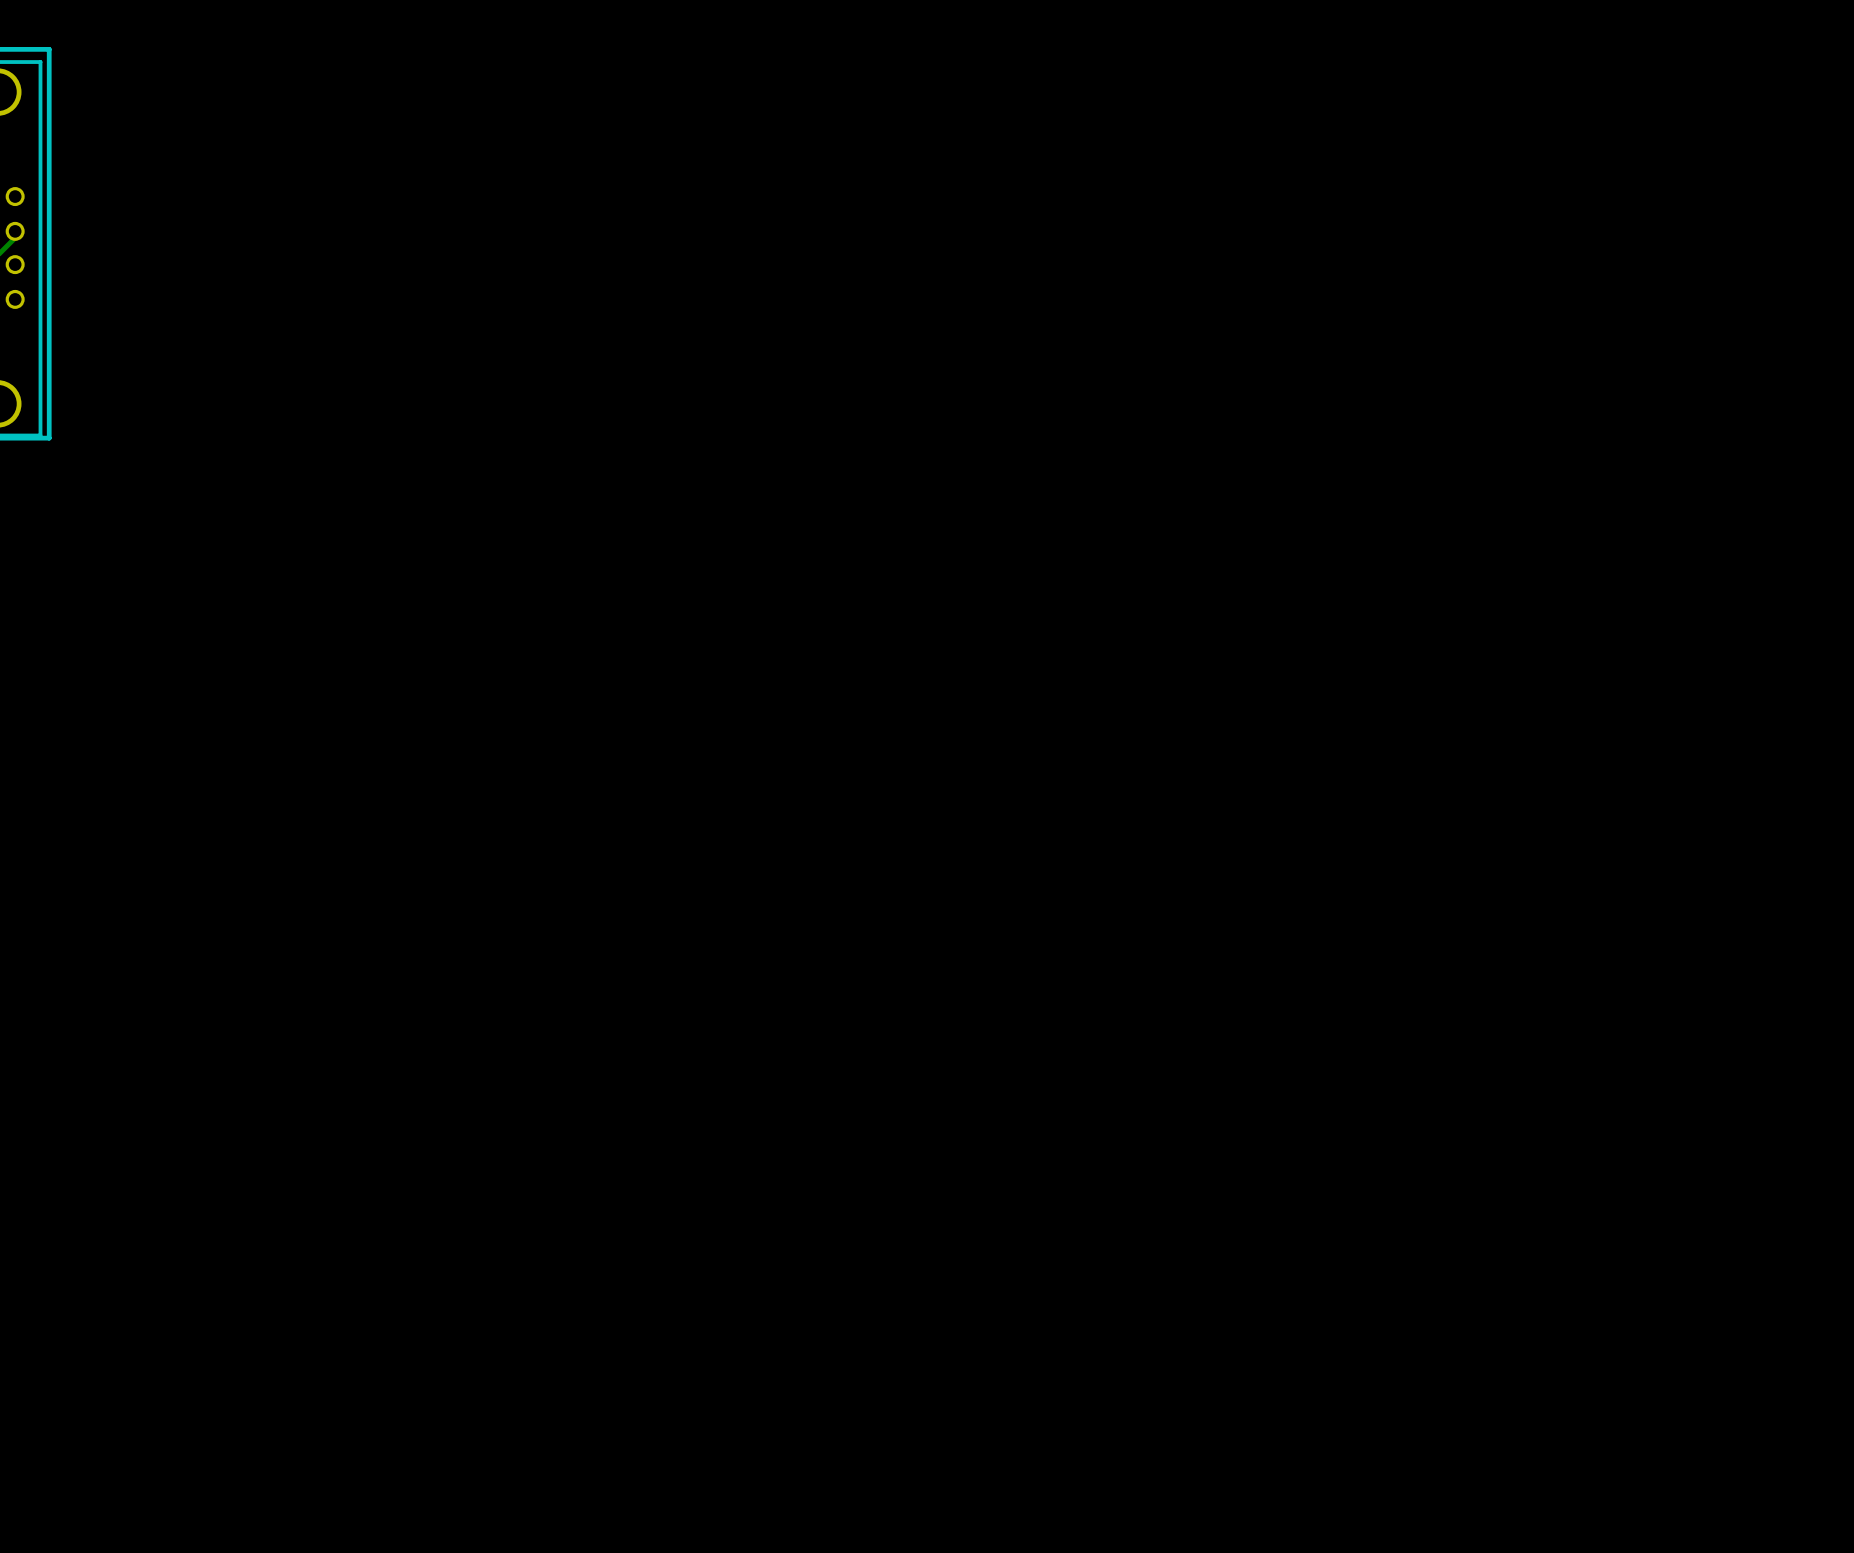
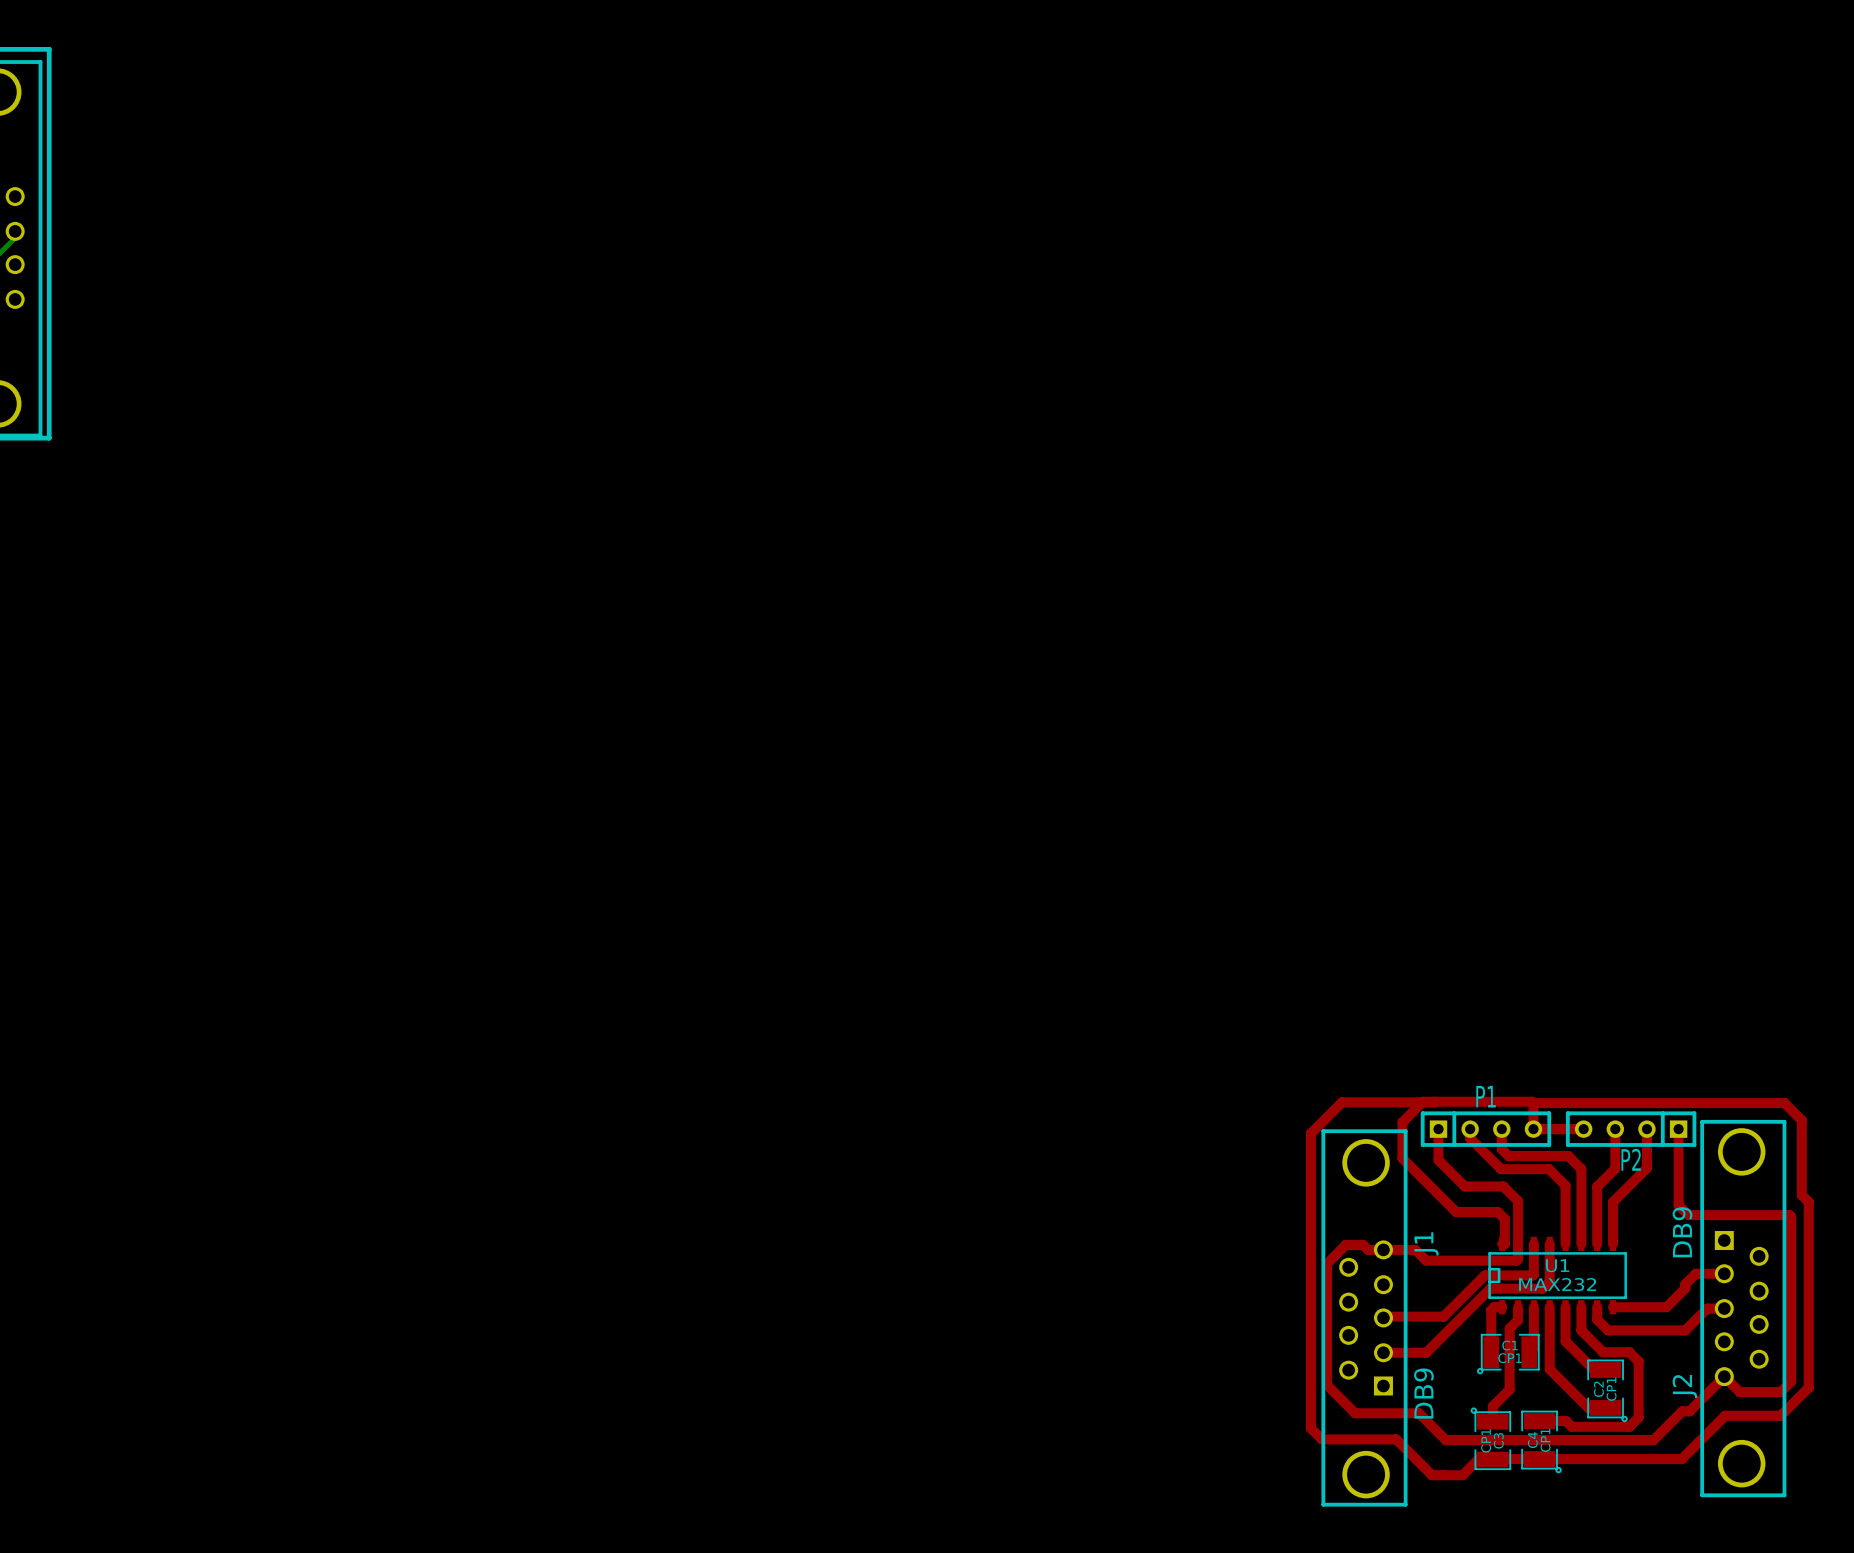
top track: none -> (1434, 1101) (1342, 1102) (1310, 1133) (1310, 1428) (1322, 1439) (1396, 1439) (1432, 1475) (1462, 1475) (1478, 1459) (1681, 1459) (1725, 1415) (1780, 1415) (1808, 1387) (1808, 1202) (1801, 1195) (1801, 1120) (1784, 1103) (1533, 1103)
top track: none -> (1533, 1103) (1533, 1129) (1583, 1129)
top track: none -> (1533, 1103) (1423, 1101) (1402, 1122) (1402, 1158) (1456, 1211) (1497, 1211) (1504, 1219) (1504, 1243) (1502, 1243)
top track: none -> (1438, 1129) (1438, 1160) (1464, 1186) (1503, 1186) (1518, 1201) (1518, 1259) (1516, 1260) (1426, 1260) (1415, 1249) (1368, 1249) (1363, 1245) (1345, 1245) (1327, 1263) (1327, 1385) (1355, 1413) (1418, 1413) (1445, 1440) (1653, 1440) (1682, 1411) (1689, 1411) (1724, 1376) (1739, 1392) (1780, 1392) (1791, 1381) (1791, 1216) (1789, 1215) (1688, 1215) (1678, 1205) (1678, 1129)
top track: none -> (1470, 1129) (1470, 1138) (1501, 1169) (1549, 1169) (1565, 1185) (1565, 1243)
P1: none -> (1485, 1129)
top track: none -> (1501, 1129) (1501, 1149) (1508, 1155) (1568, 1155) (1581, 1169) (1581, 1243)
top track: none -> (1615, 1129) (1615, 1168) (1597, 1186) (1597, 1243)
P2: none -> (1631, 1129)
top track: none -> (1646, 1129) (1646, 1168) (1613, 1202) (1613, 1243)
top track: none -> (1533, 1243) (1533, 1275) (1484, 1275) (1443, 1316) (1383, 1317)
top track: none -> (1549, 1243) (1549, 1281) (1542, 1288) (1490, 1288) (1426, 1352) (1383, 1352)
top track: none -> (1724, 1273) (1695, 1273) (1685, 1284) (1685, 1288) (1666, 1307) (1613, 1307)
U1: none -> MAX232 (1557, 1275)
top track: none -> (1502, 1307) (1494, 1307) (1491, 1310) (1491, 1352)
top track: none -> (1518, 1307) (1518, 1320) (1509, 1328) (1509, 1389) (1492, 1406) (1492, 1421)
top track: none -> (1533, 1307) (1533, 1347) (1529, 1352)
top track: none -> (1549, 1307) (1549, 1369) (1588, 1407) (1605, 1407)
top track: none -> (1565, 1307) (1565, 1341) (1594, 1369) (1605, 1369)
top track: none -> (1581, 1307) (1581, 1330) (1603, 1352) (1629, 1352) (1638, 1361) (1638, 1417) (1629, 1426) (1571, 1426) (1566, 1421) (1539, 1421)
top track: none -> (1597, 1307) (1597, 1319) (1608, 1330) (1685, 1330) (1707, 1308) (1724, 1308)
J2: none -> DB9 (1743, 1308)
J1: none -> DB9 (1364, 1317)
C1: none -> CP1 (1508, 1354)
C2: none -> CP1 (1607, 1390)
C3: none -> CP1 (1490, 1438)
C4: none -> CP1 (1541, 1441)

